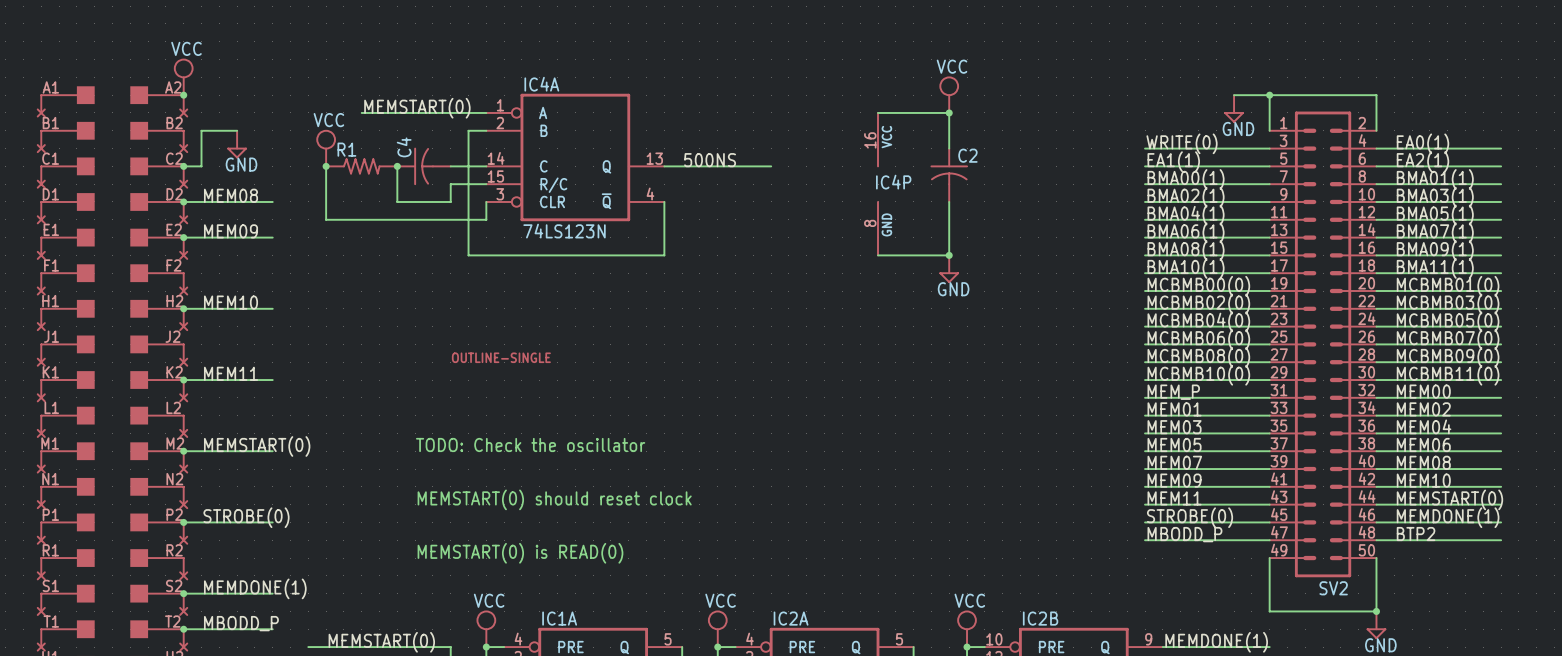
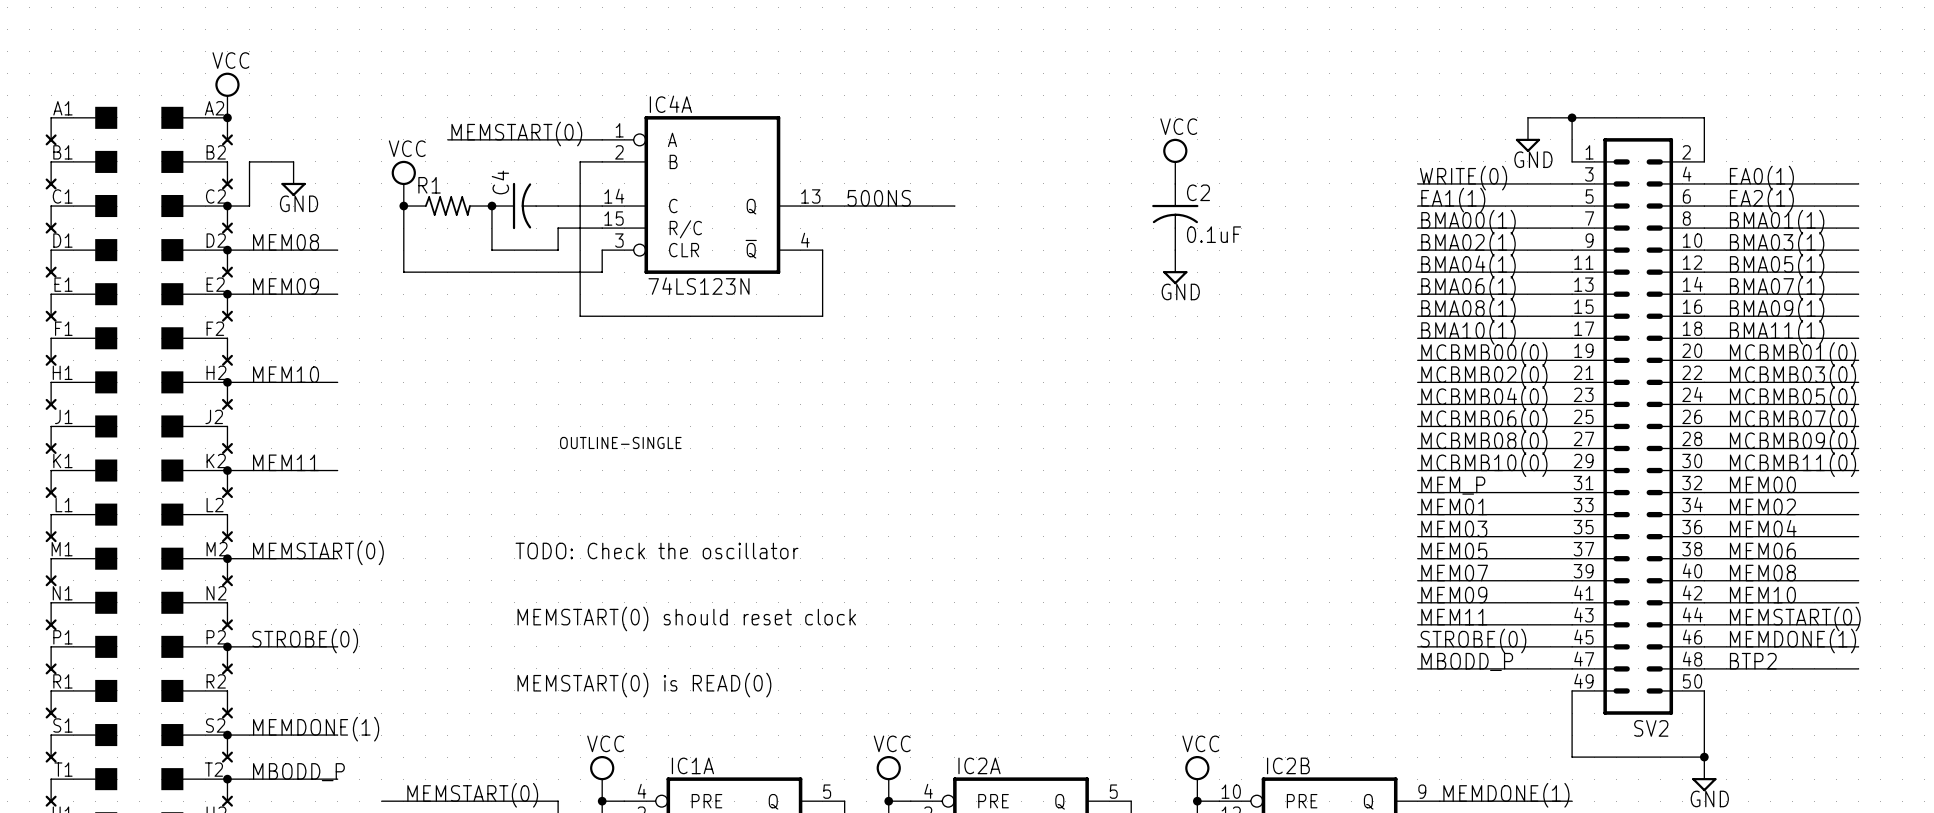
power symbol position: VCC (949, 94) -> VCC (1175, 161)
wire: (878, 112) (949, 112) (949, 148) -> none
junction: (949, 112) -> none
IC4P: (878, 184) -> none
C2 value: none -> 0.1uF (1214, 234)
wire: (949, 201) (949, 255) (878, 255) -> none
junction: (949, 255) -> none
power symbol position: GND (949, 269) -> GND (1175, 267)

